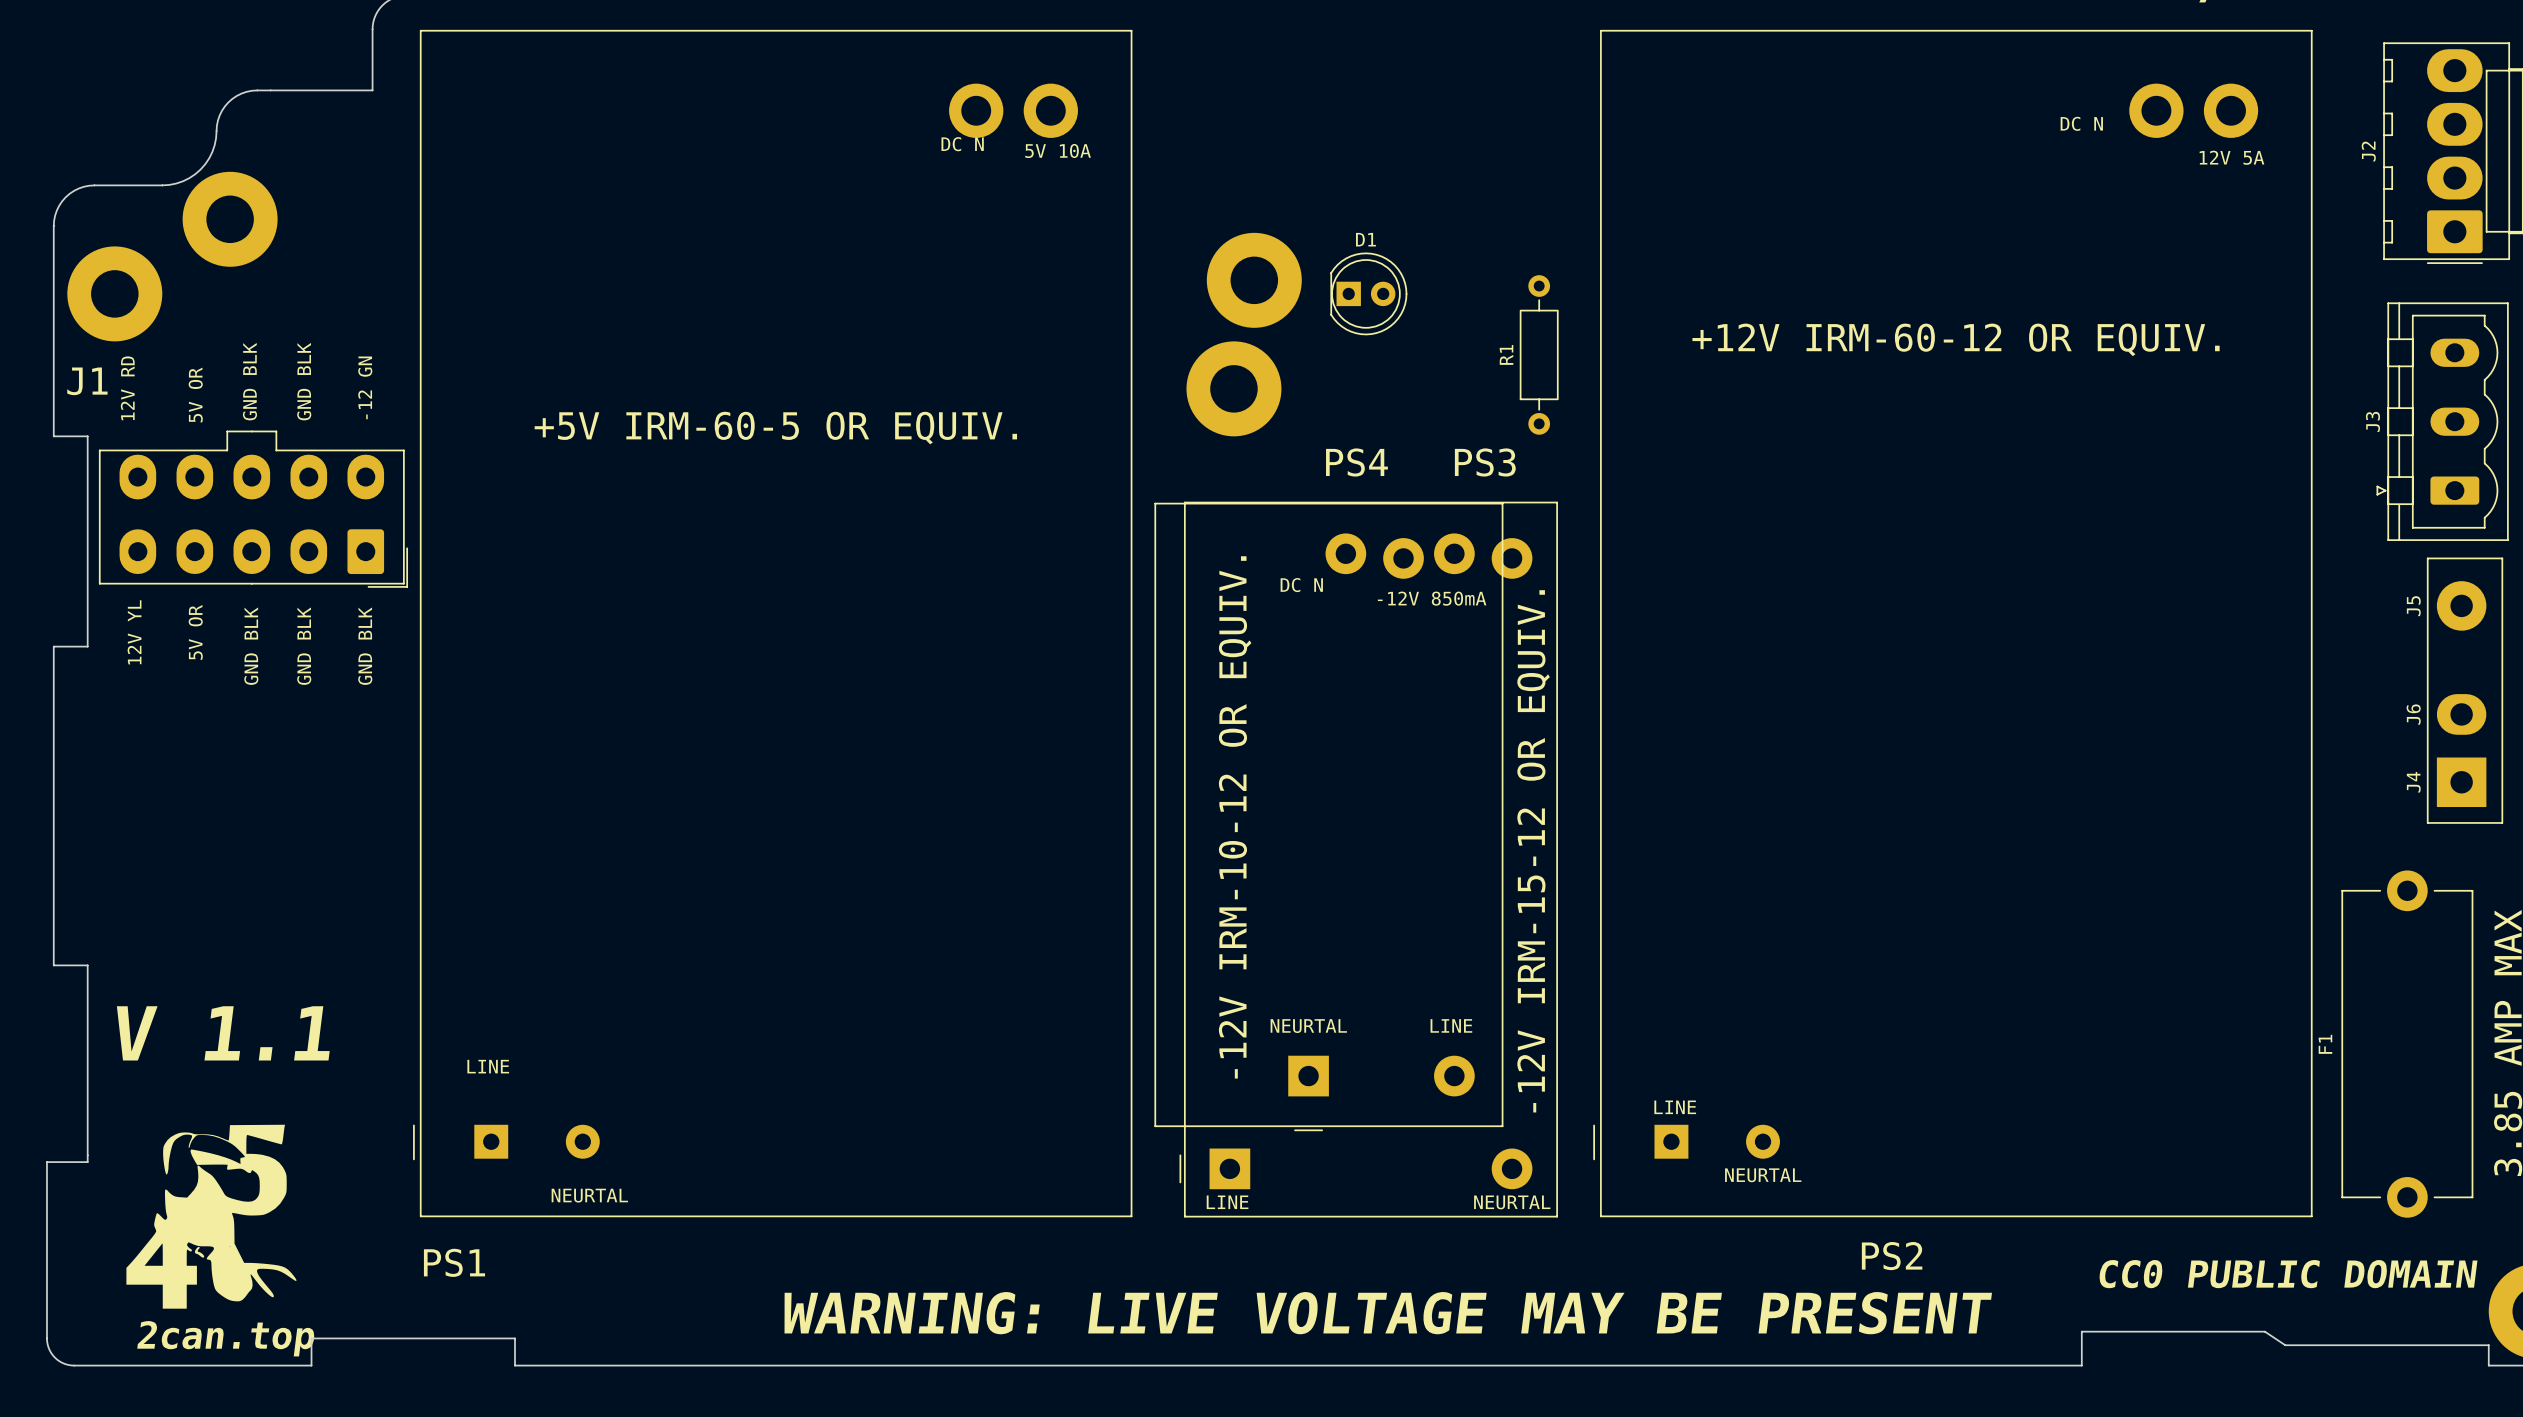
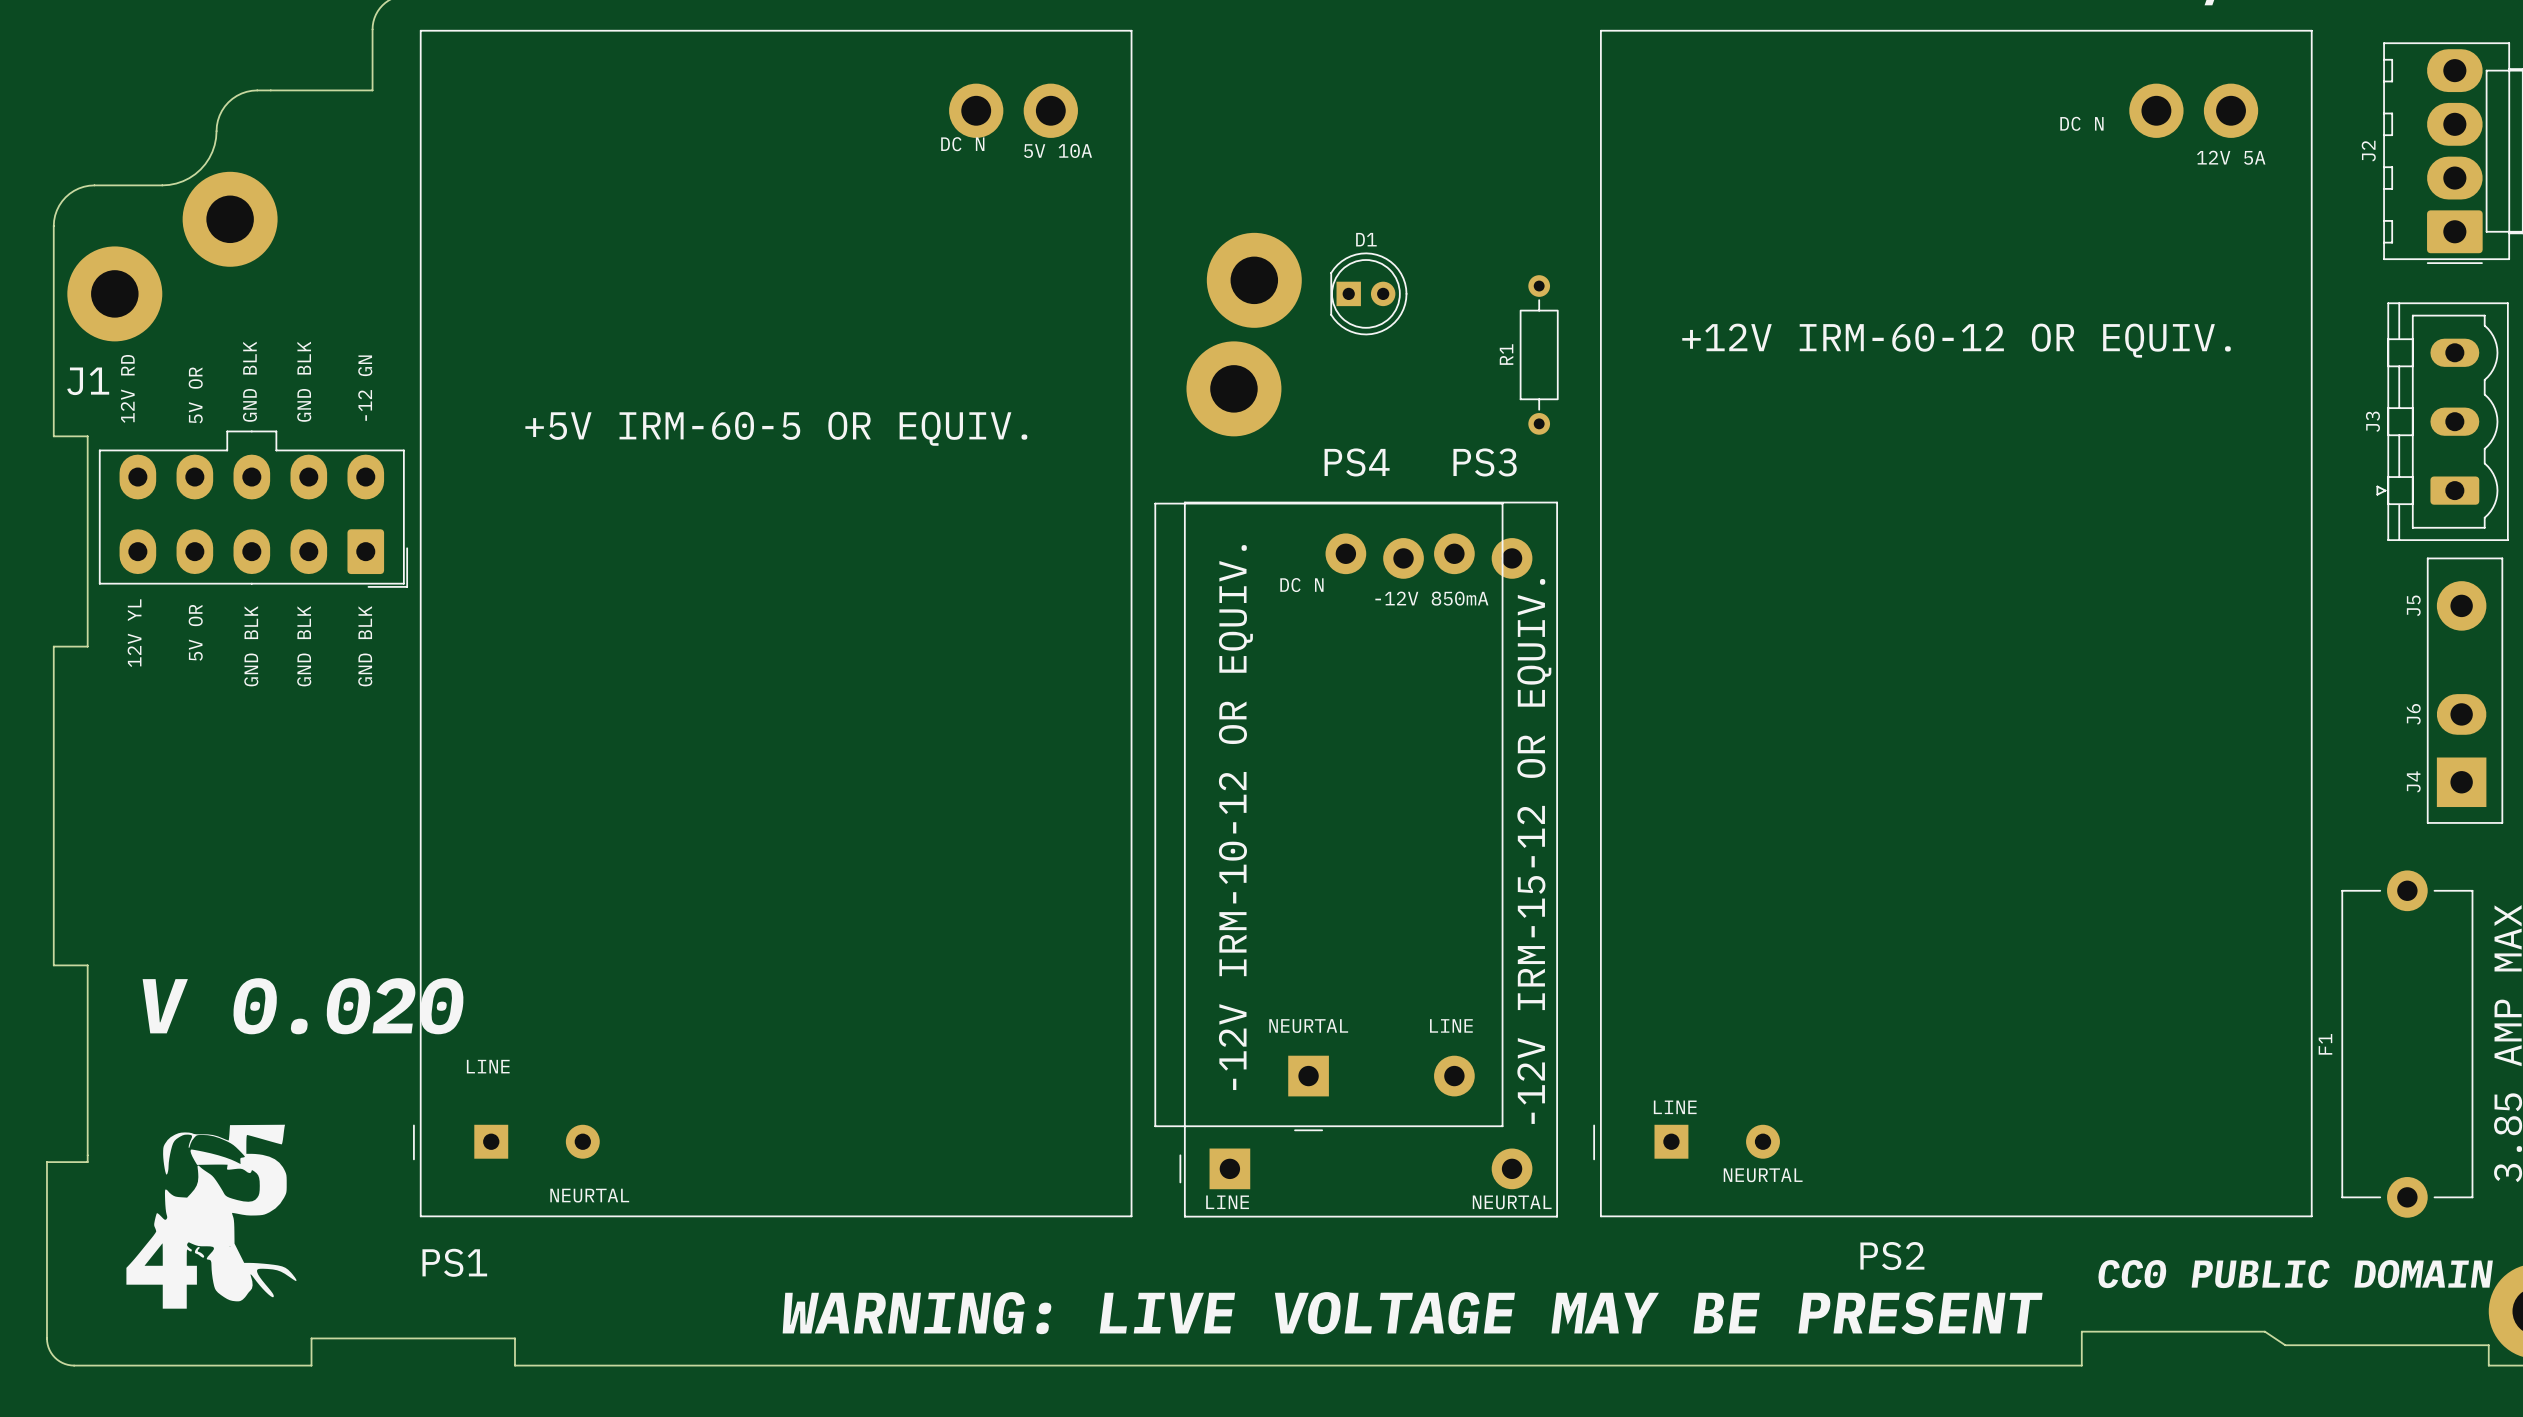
text: none -> V 0.020 (303, 1006)
text: V 1.1 (223, 1033) -> none
text: 2can.top (225, 1338) -> none

